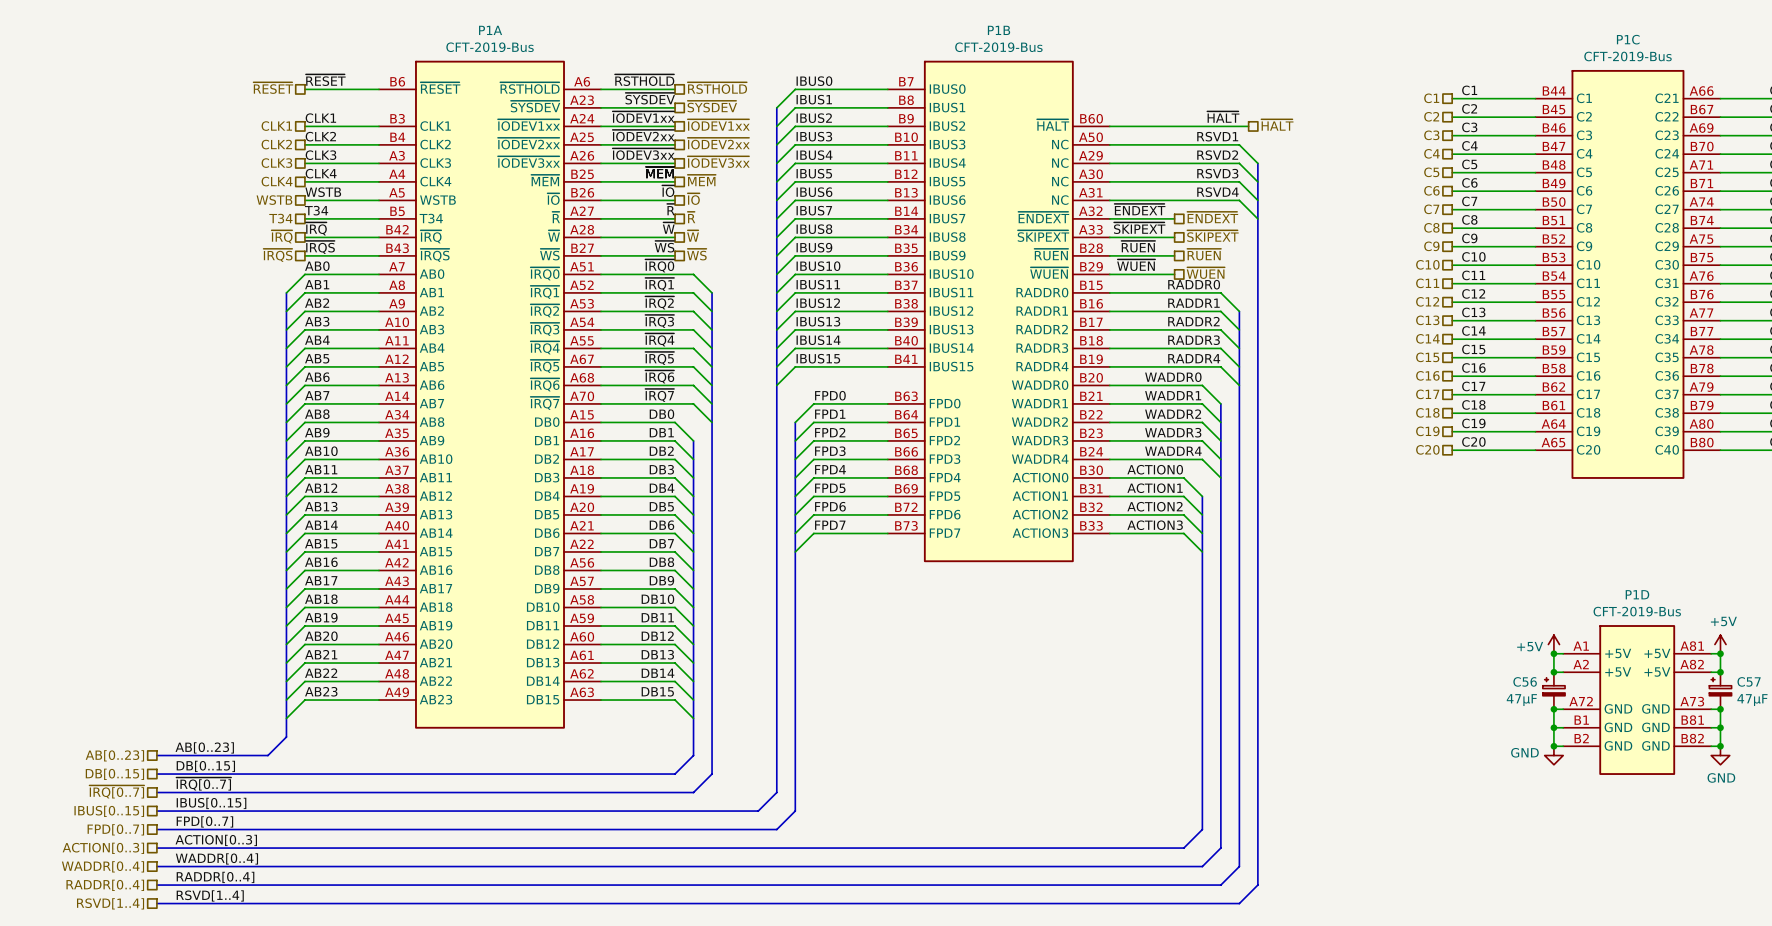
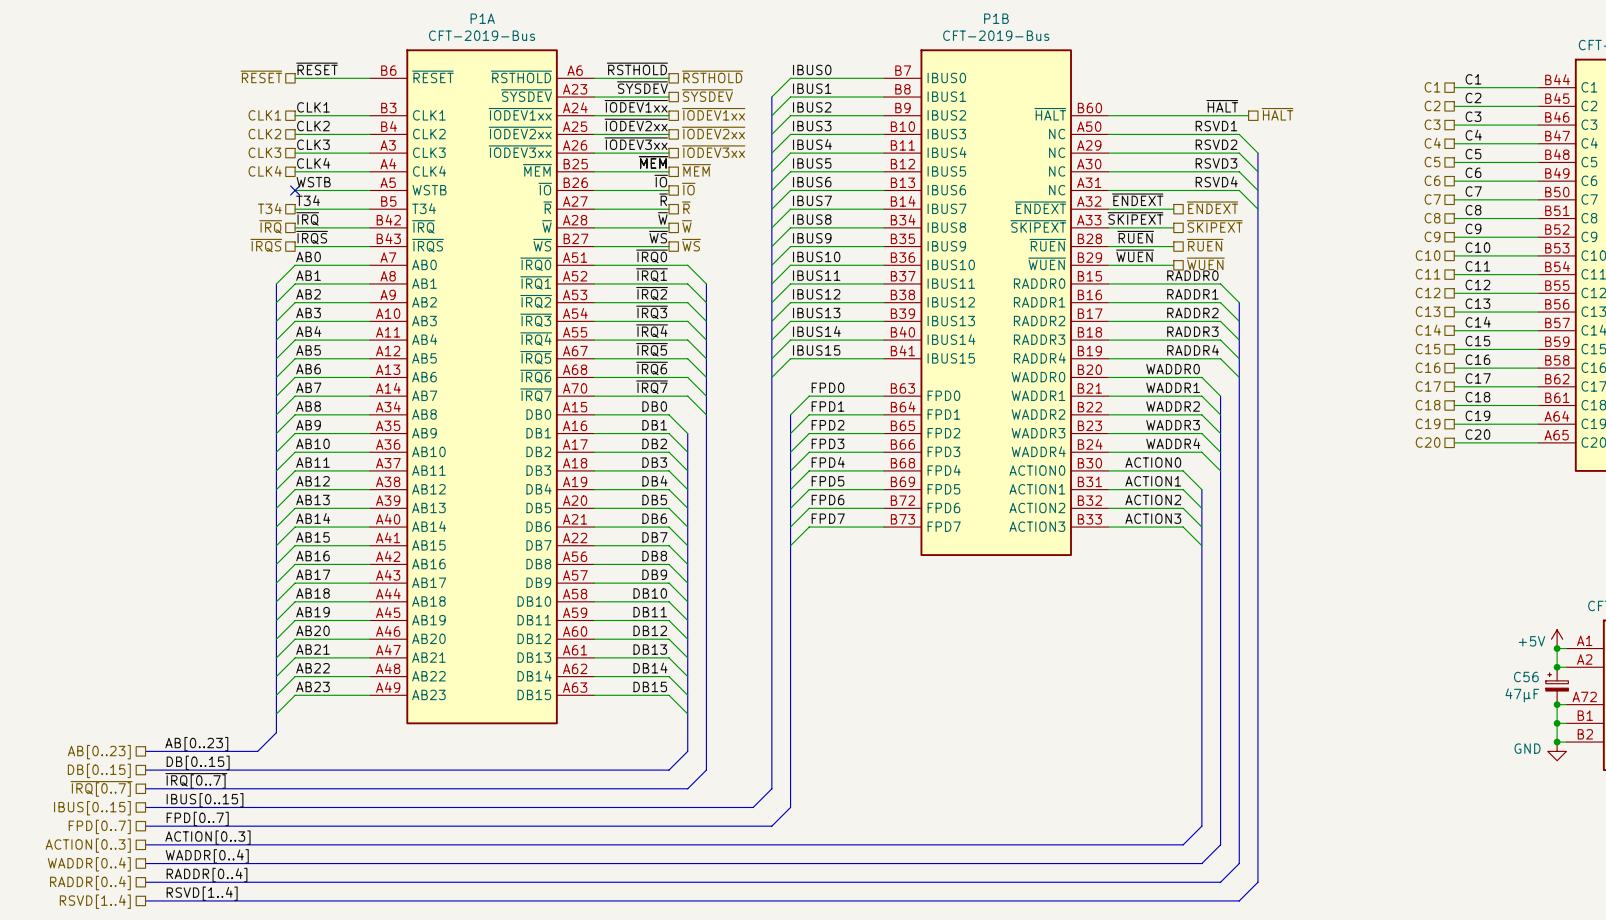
hierarchical label: WSTB (274, 200) -> none
no-connect mark: none -> (295, 190)

